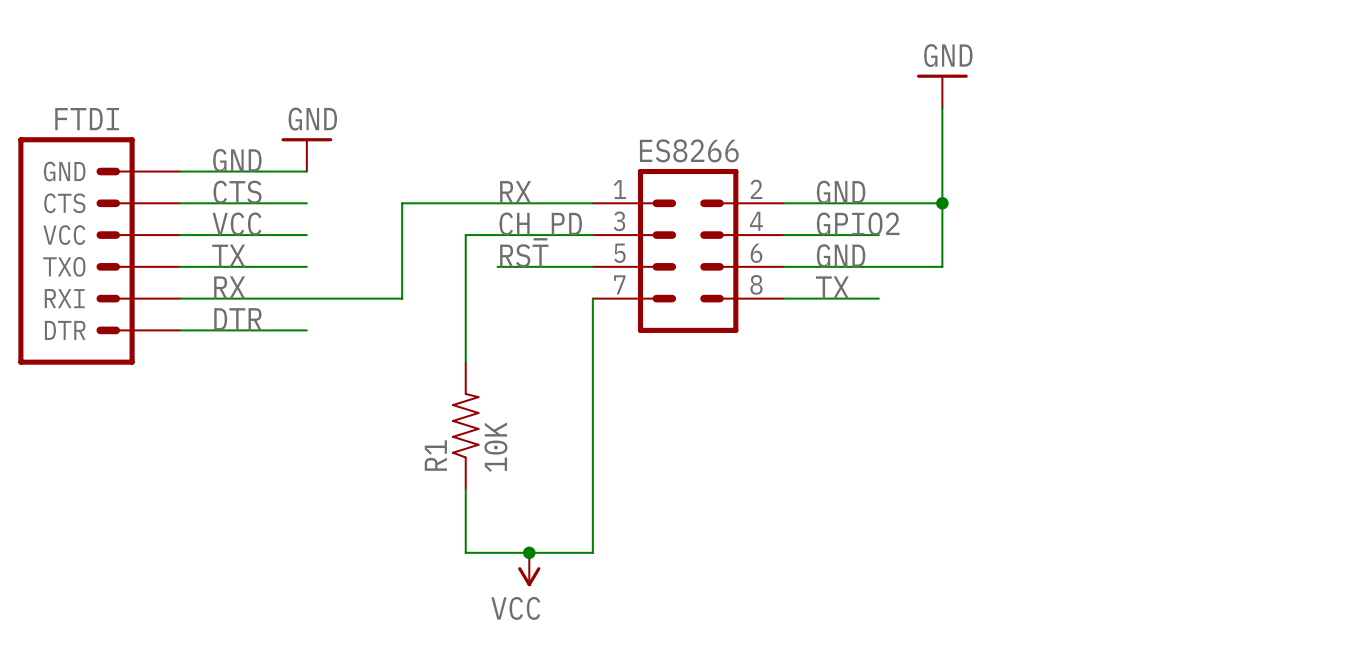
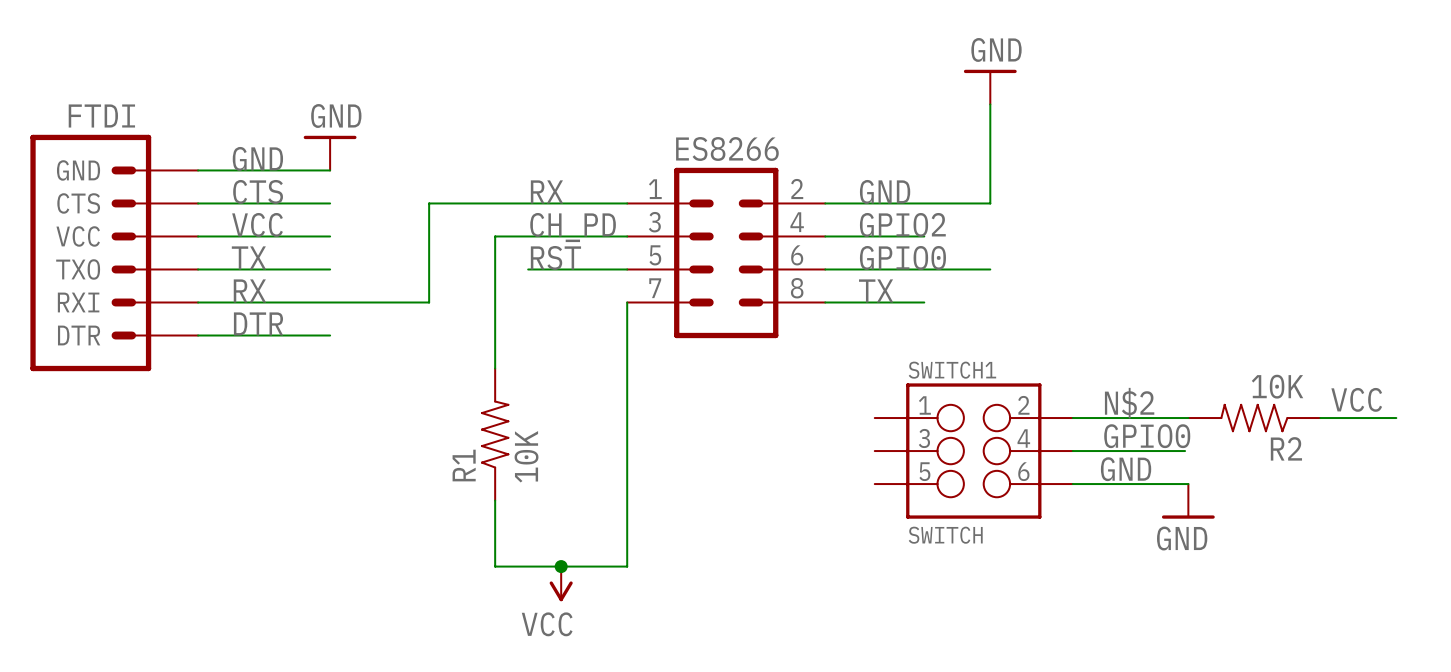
wire: (942, 203) (942, 266) -> none
junction: (942, 203) -> none
label: GND (841, 255) -> GPIO0 (902, 257)
label: none -> VCC (1356, 399)
label: none -> N$2 (1129, 403)
wire: none -> (1072, 418) (1188, 418)
R2: none -> 10K (1254, 418)
wire: none -> (1320, 418) (1396, 418)
label: none -> GPIO0 (1147, 436)
SWITCH1: none -> SWITCH (973, 451)
wire: none -> (1072, 451) (1185, 451)
label: none -> GND (1126, 469)
wire: none -> (1072, 484) (1188, 484)
power symbol: none -> GND (1188, 501)

